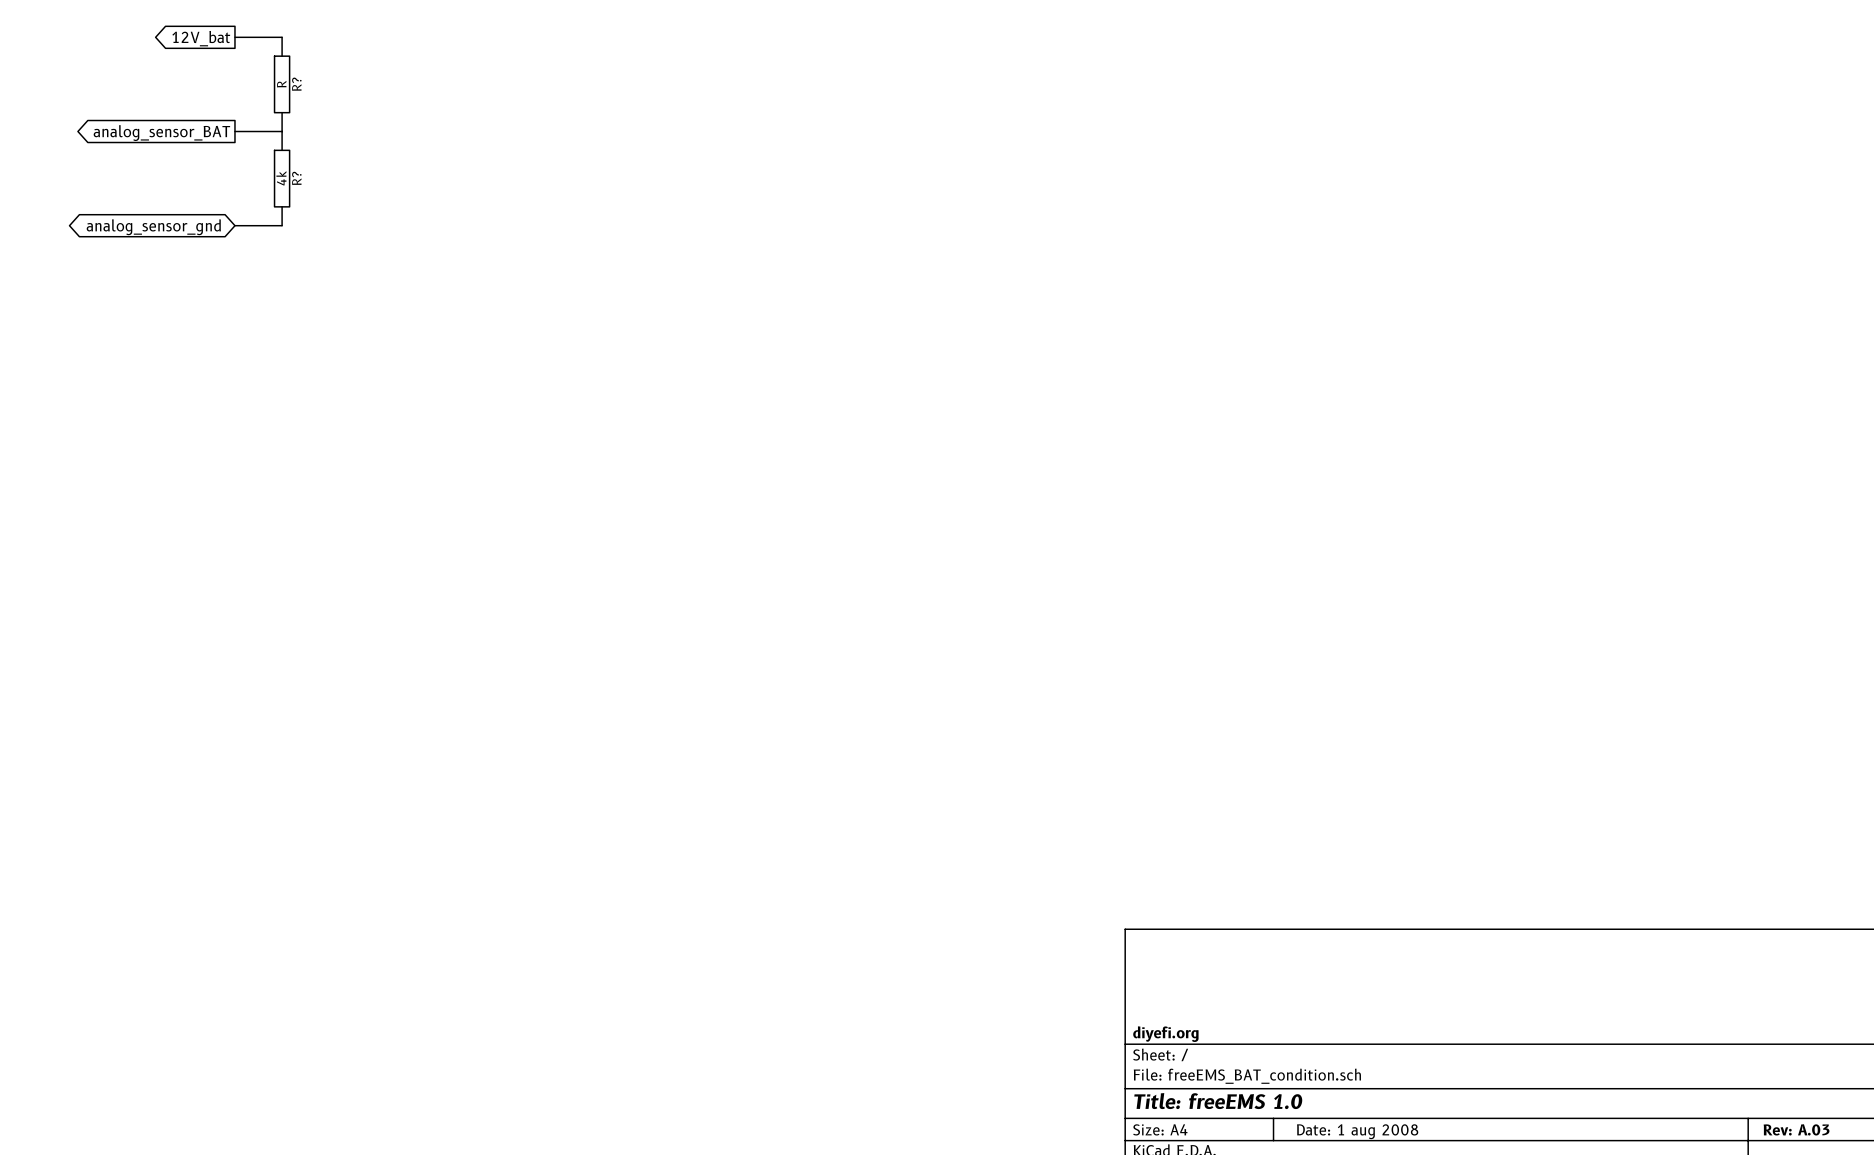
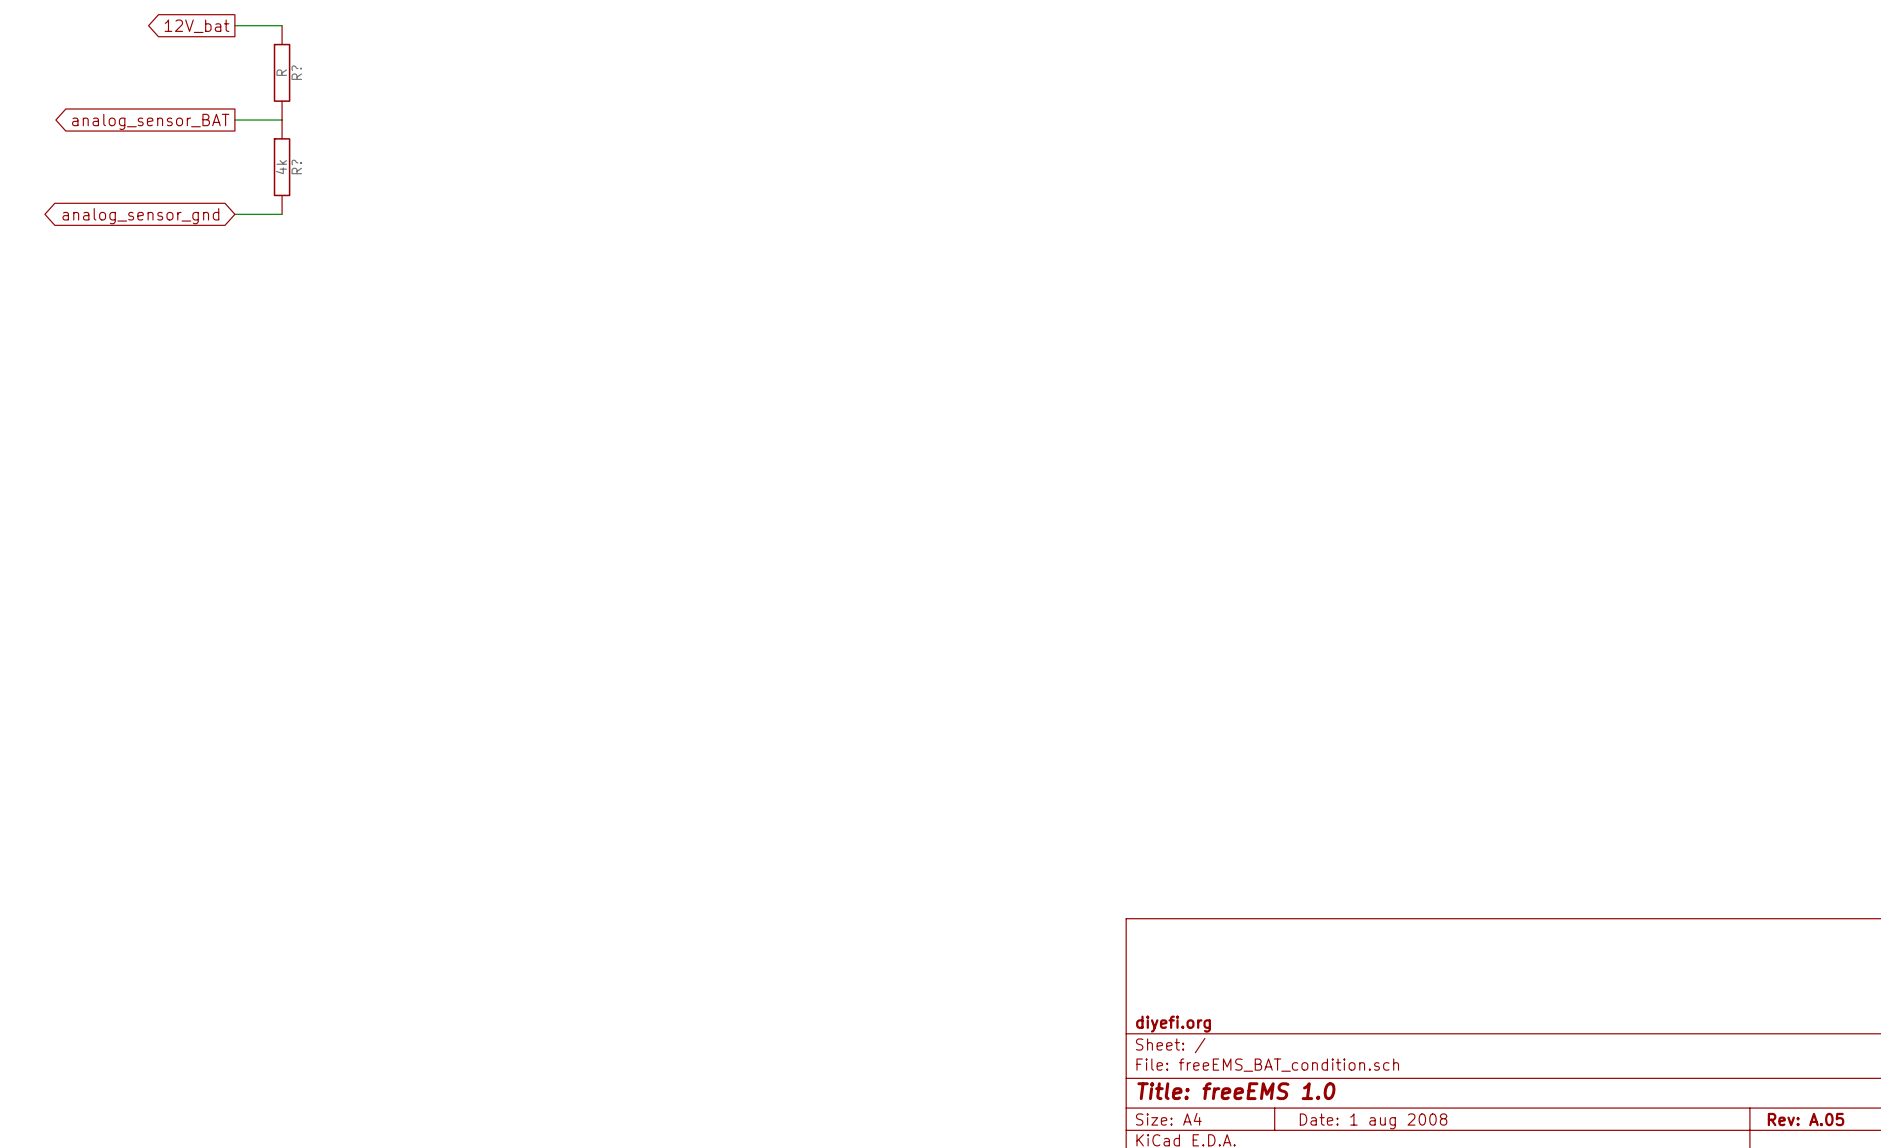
title block: Rev: A.03 (1796, 1129) -> Rev: A.05 (1806, 1119)

